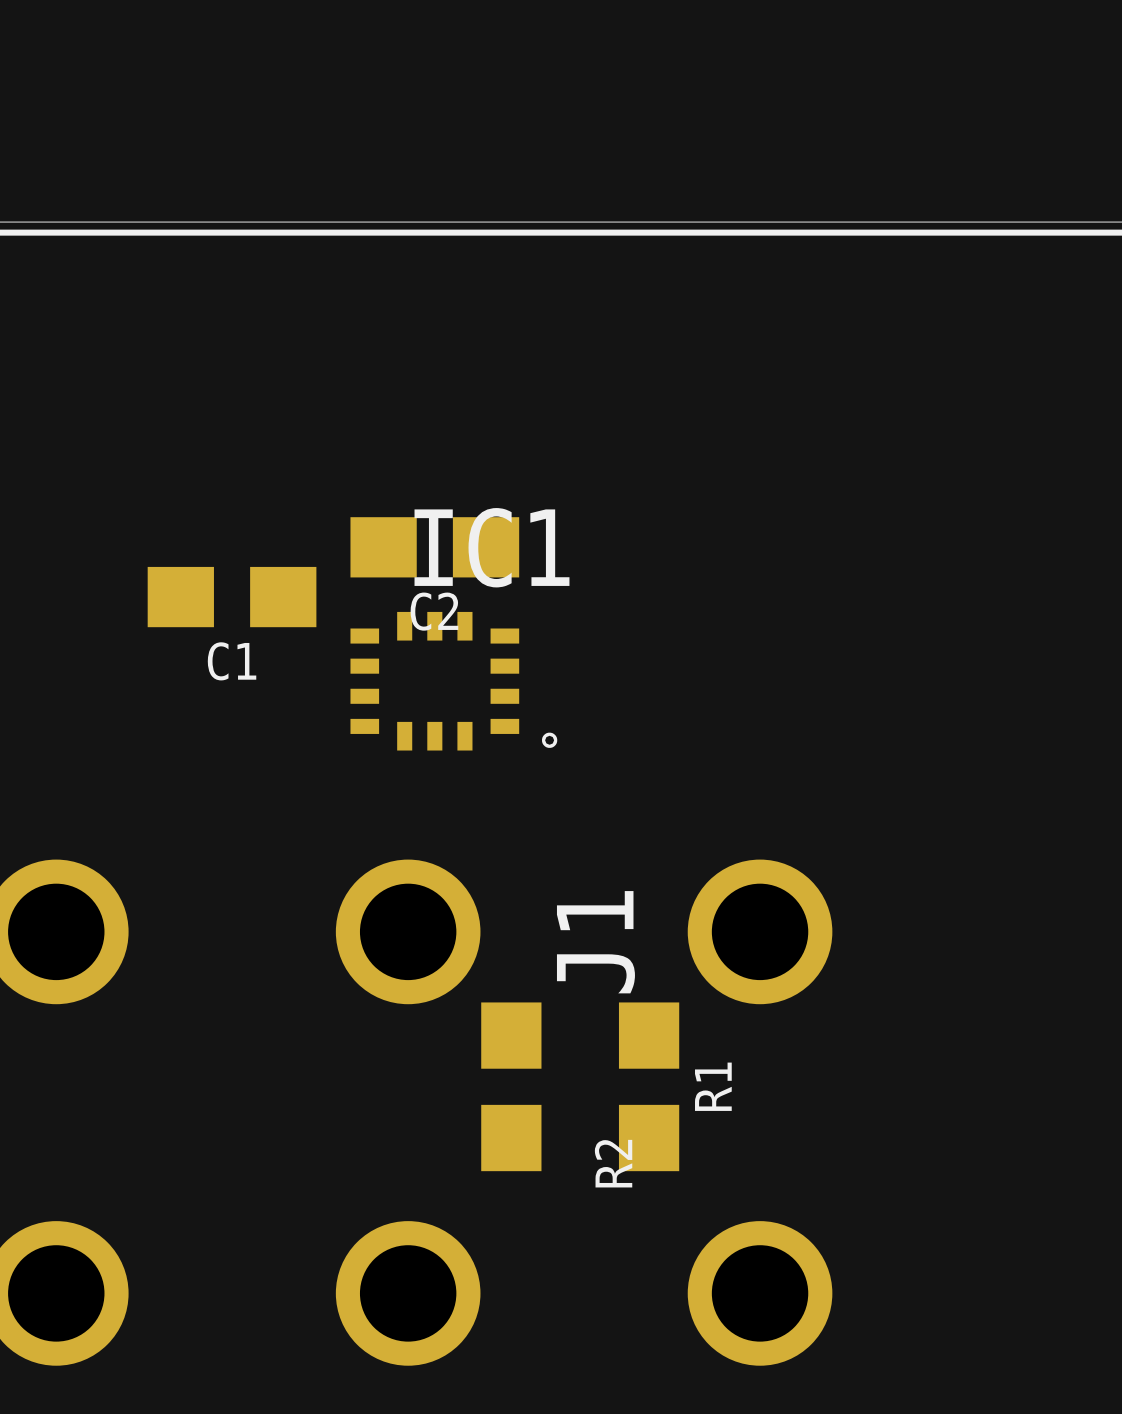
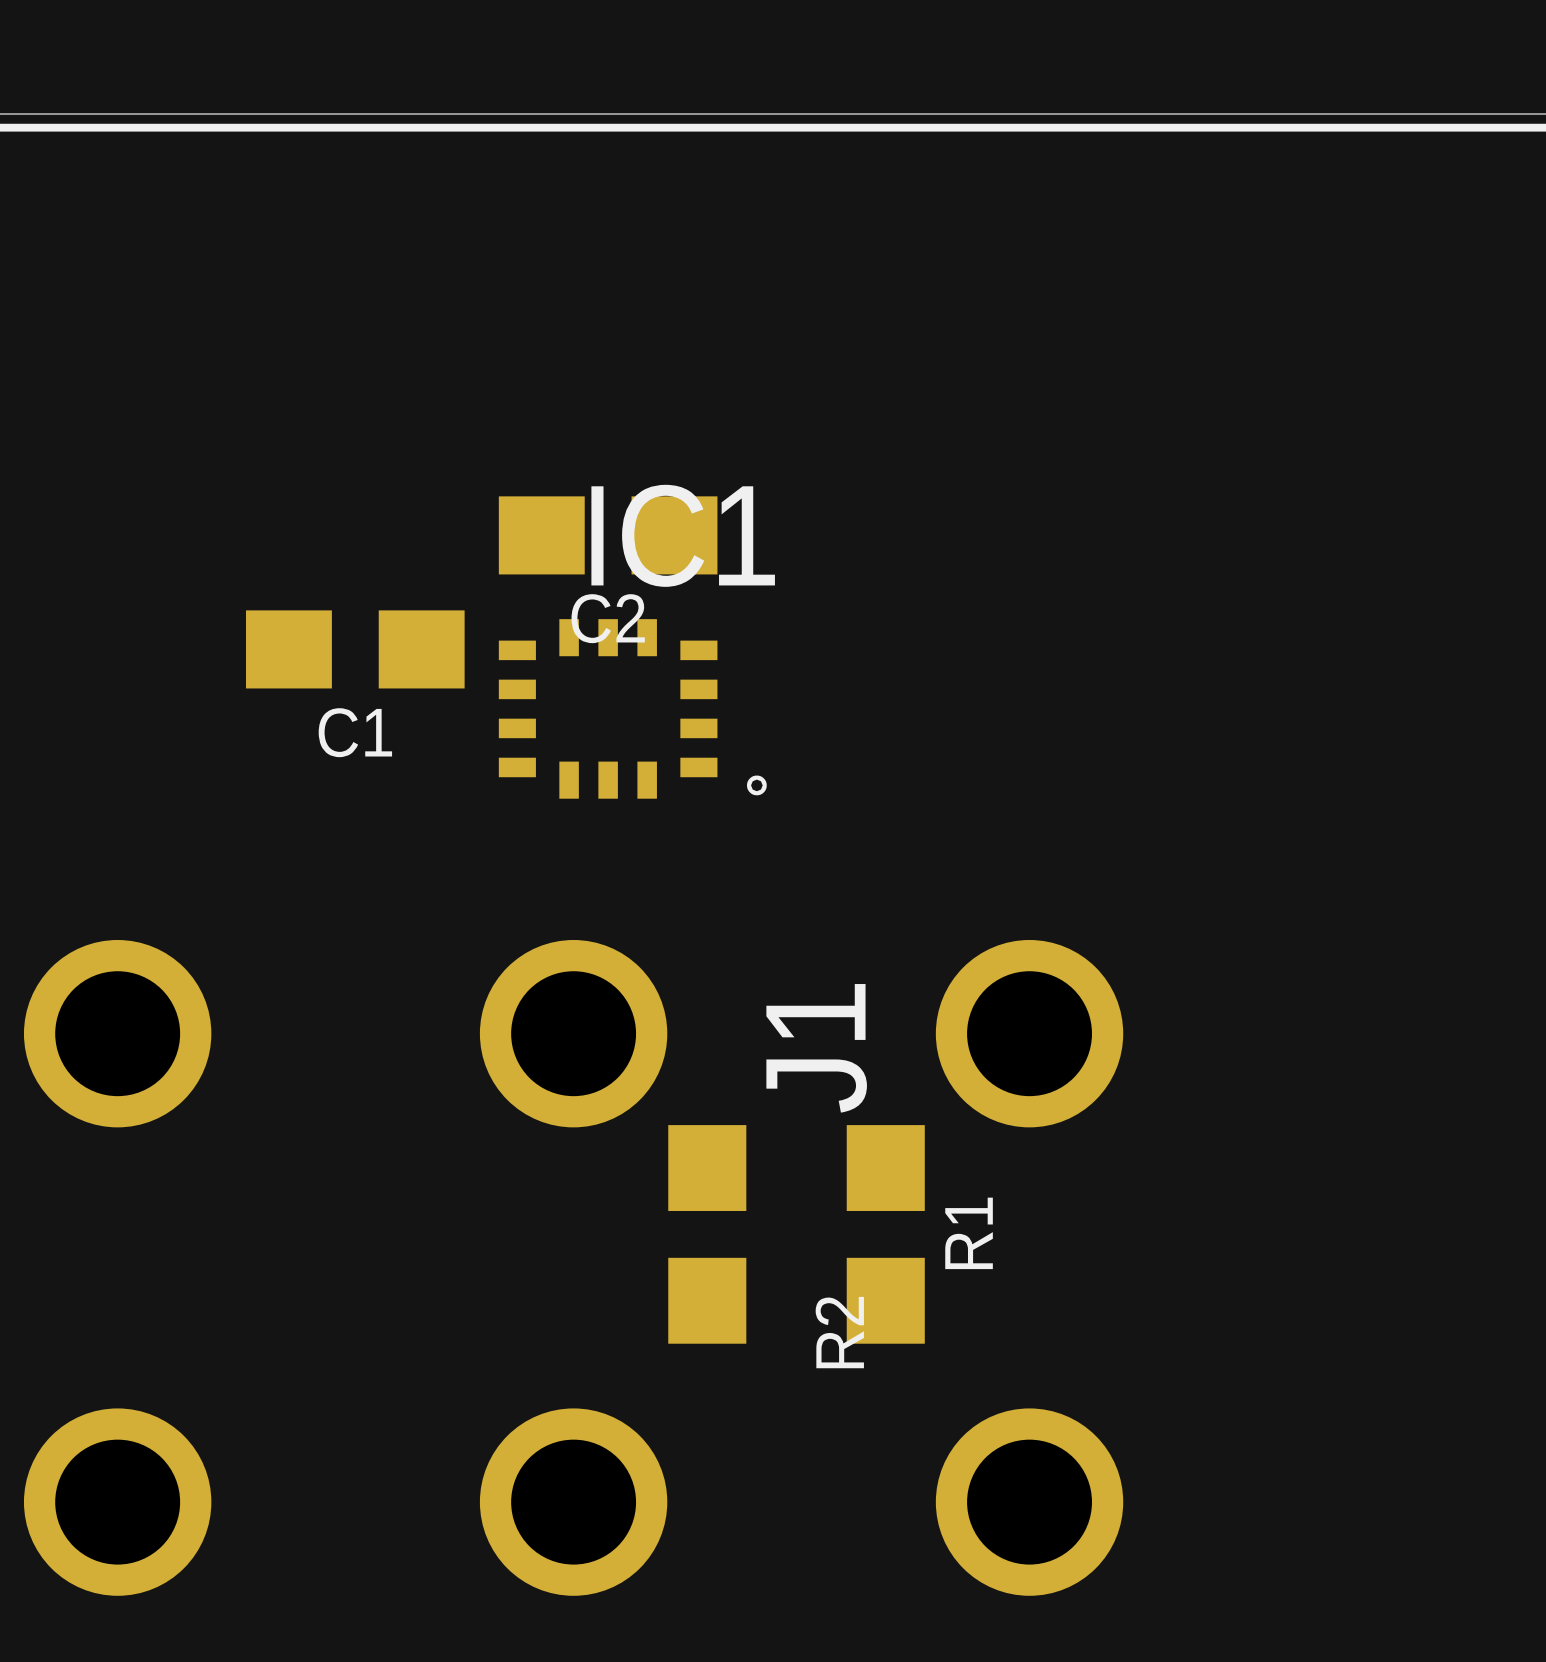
C1 position: (232, 597) -> (355, 649)

